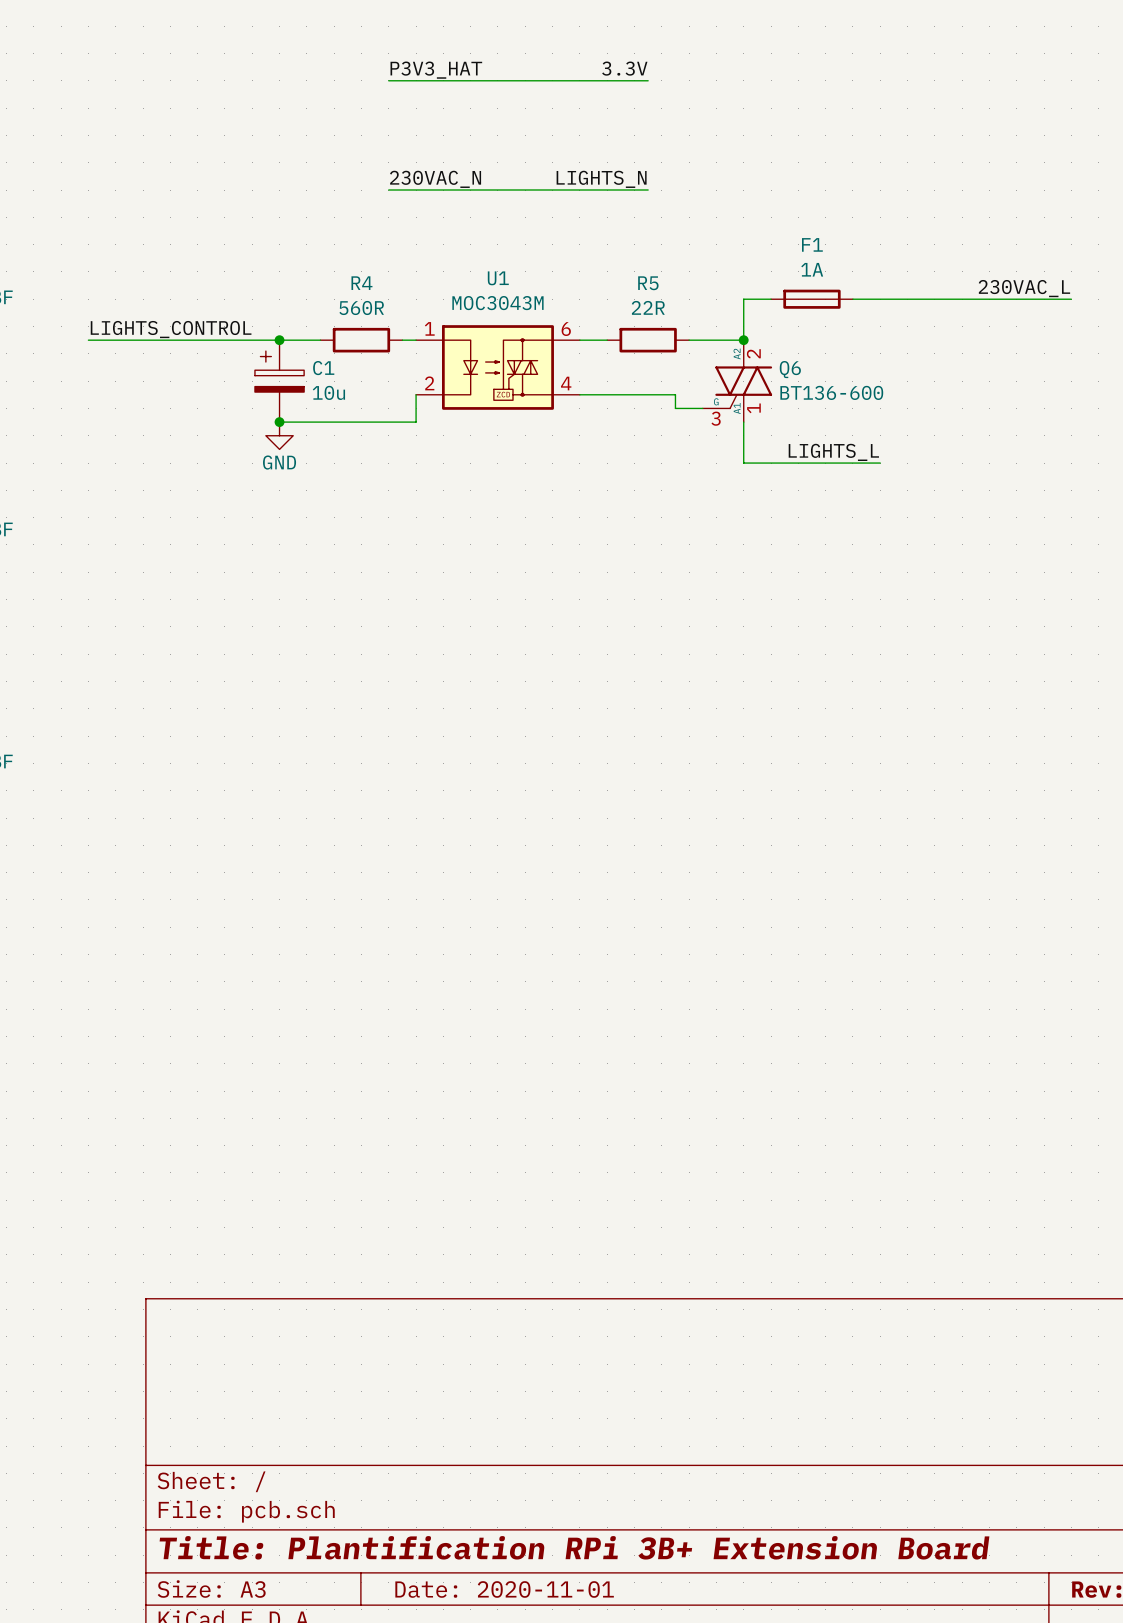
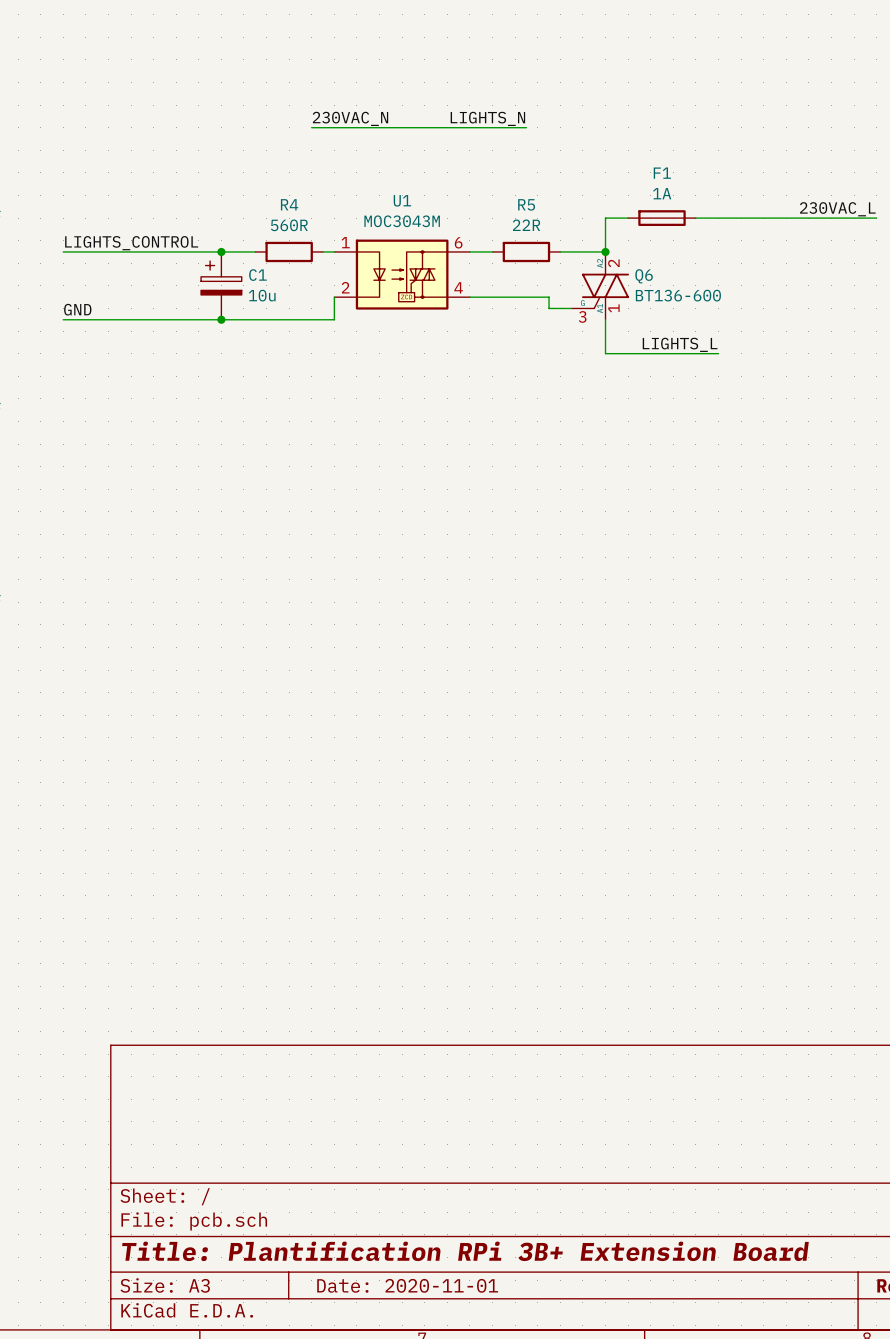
label: 3.3V (624, 68) -> none
label: P3V3_HAT (436, 70) -> none
wire: (388, 80) (648, 80) -> none
label: none -> GND (77, 309)
wire: none -> (63, 319) (221, 319)
power symbol: GND (279, 435) -> none

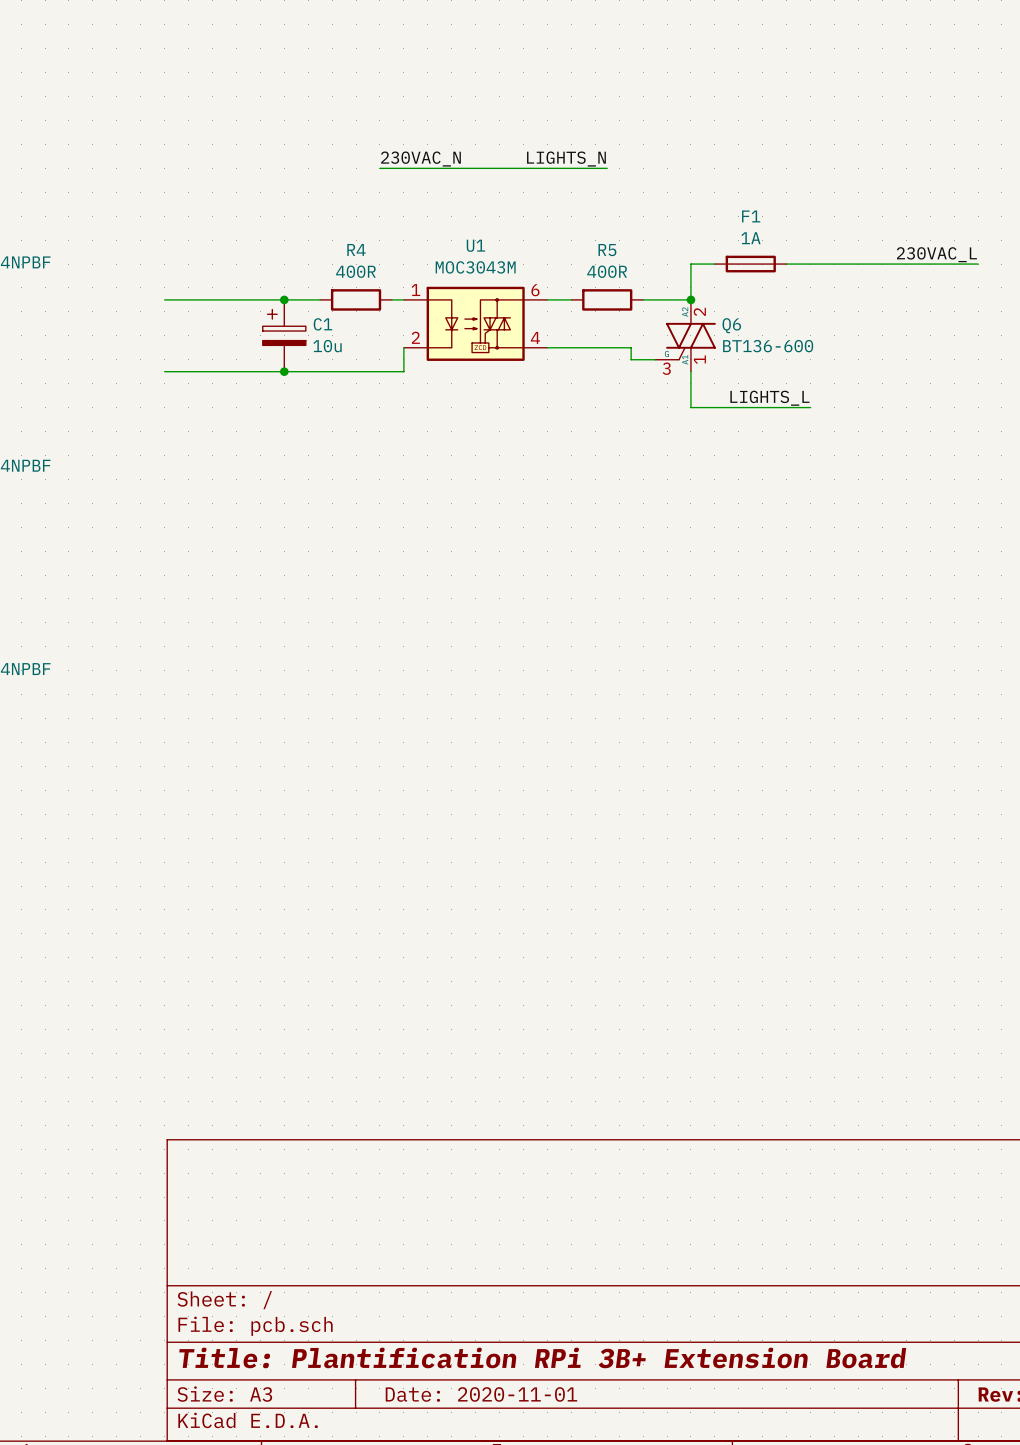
R4 value: 560R (289, 225) -> 400R (355, 271)
R5 value: 22R (526, 225) -> 400R (607, 271)
label: LIGHTS_CONTROL (131, 243) -> none
wire: (63, 251) (108, 251) -> none
label: GND (77, 309) -> none
wire: (63, 319) (108, 319) -> none

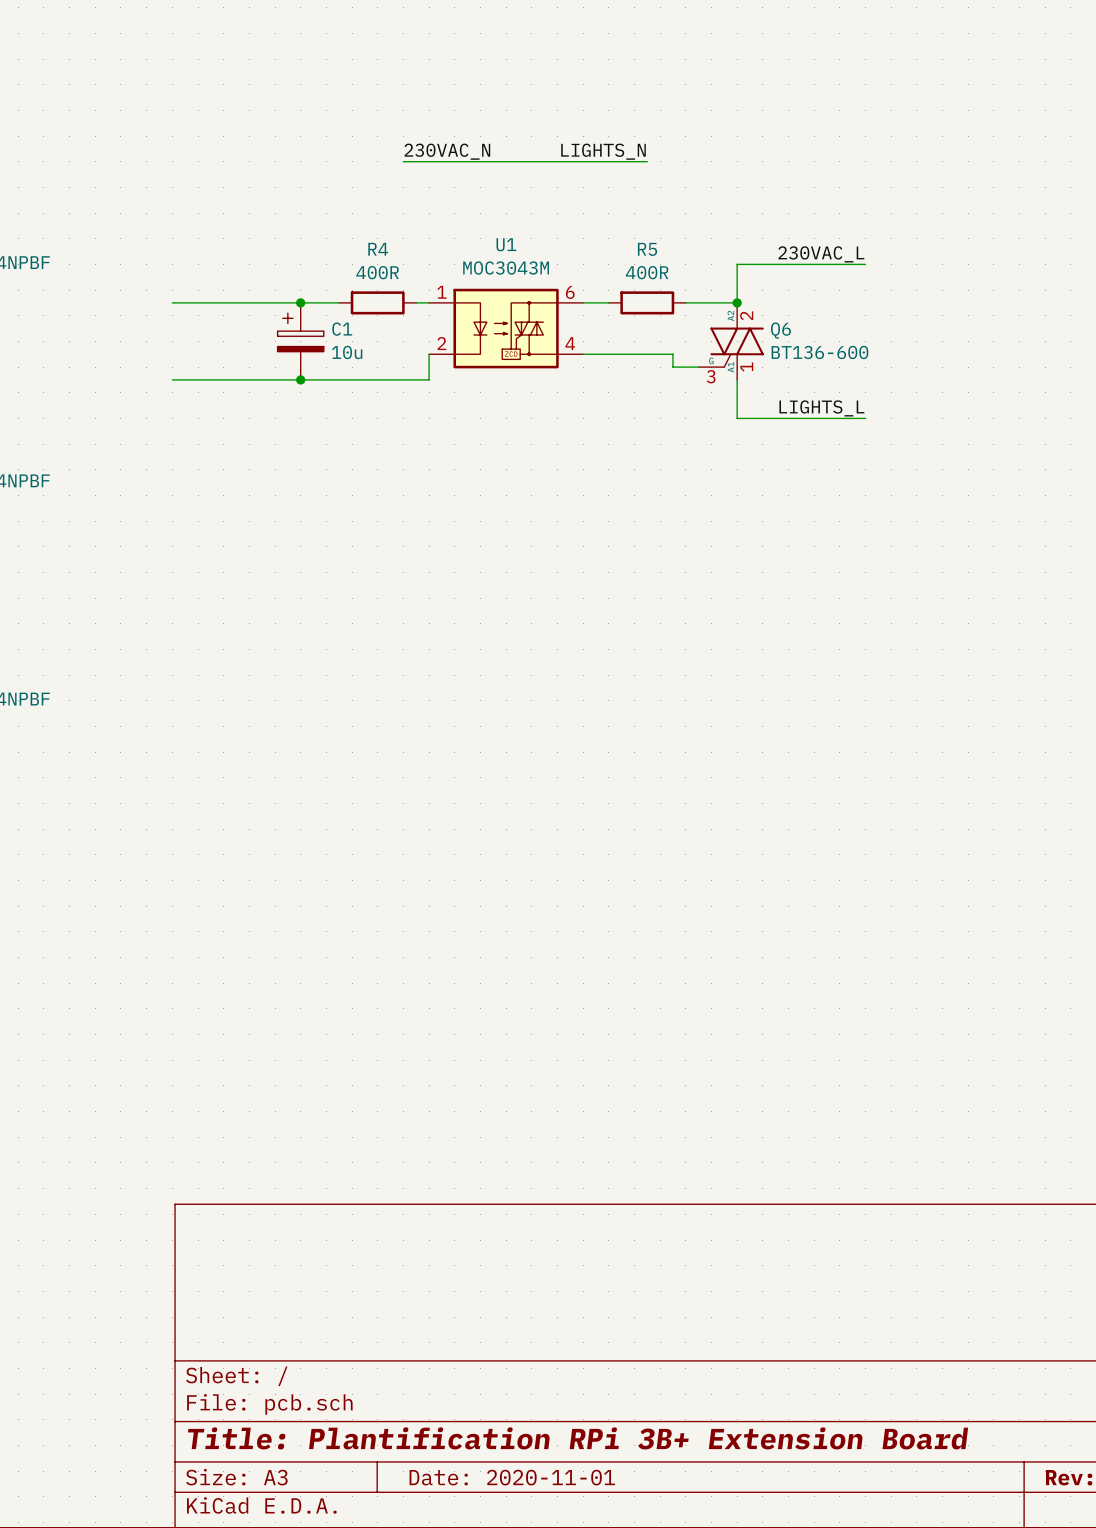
label position: 230VAC_L (936, 254) -> 230VAC_L (821, 254)
F1: 1A (750, 264) -> none
wire: (810, 264) (978, 264) -> none

